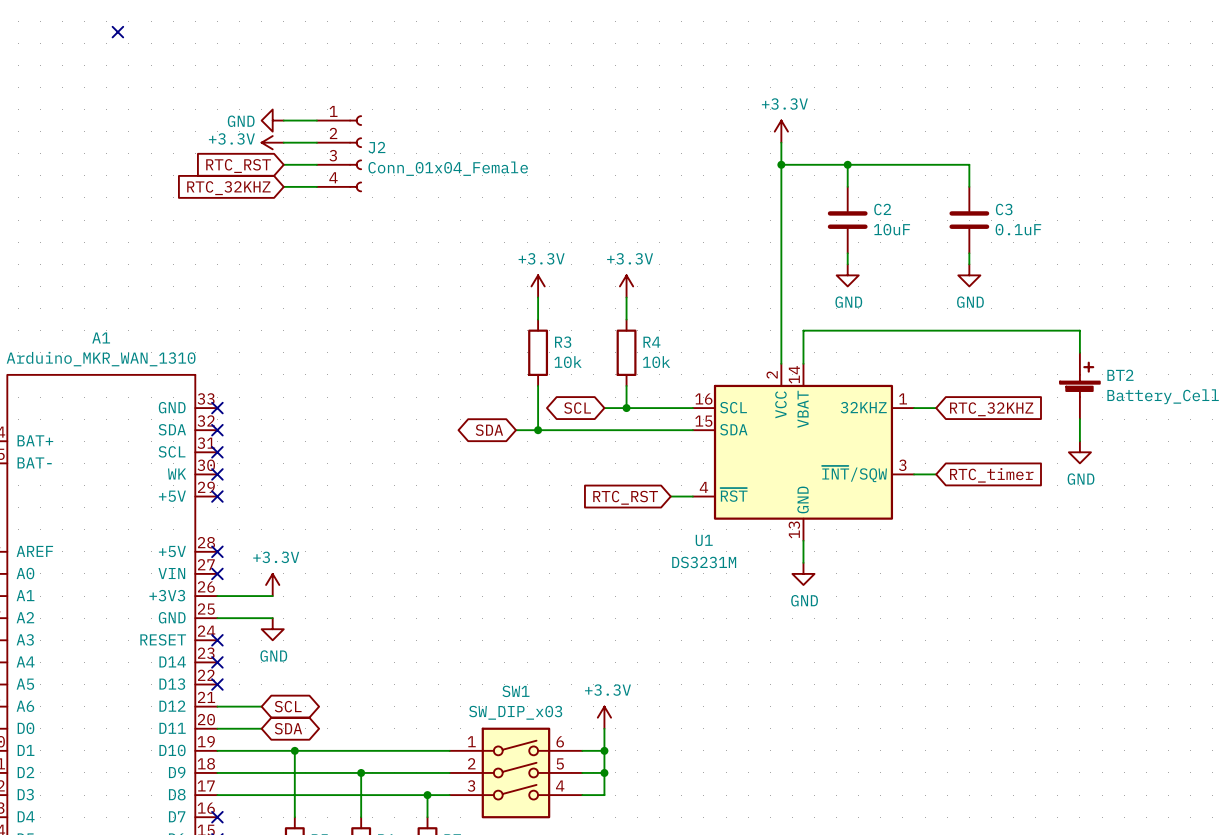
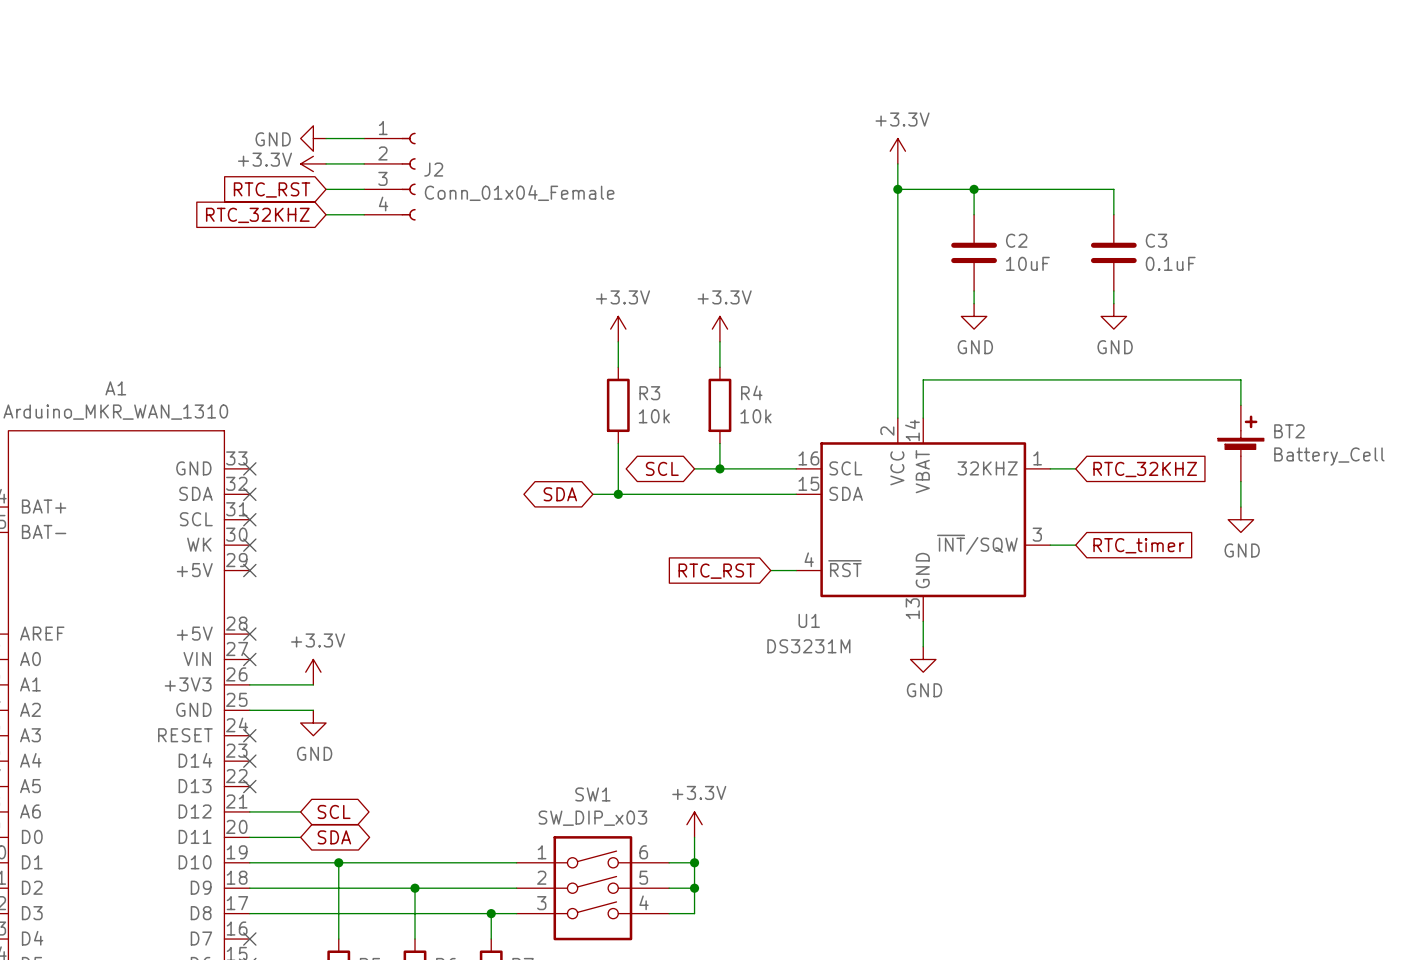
no-connect mark: (117, 32) -> none

